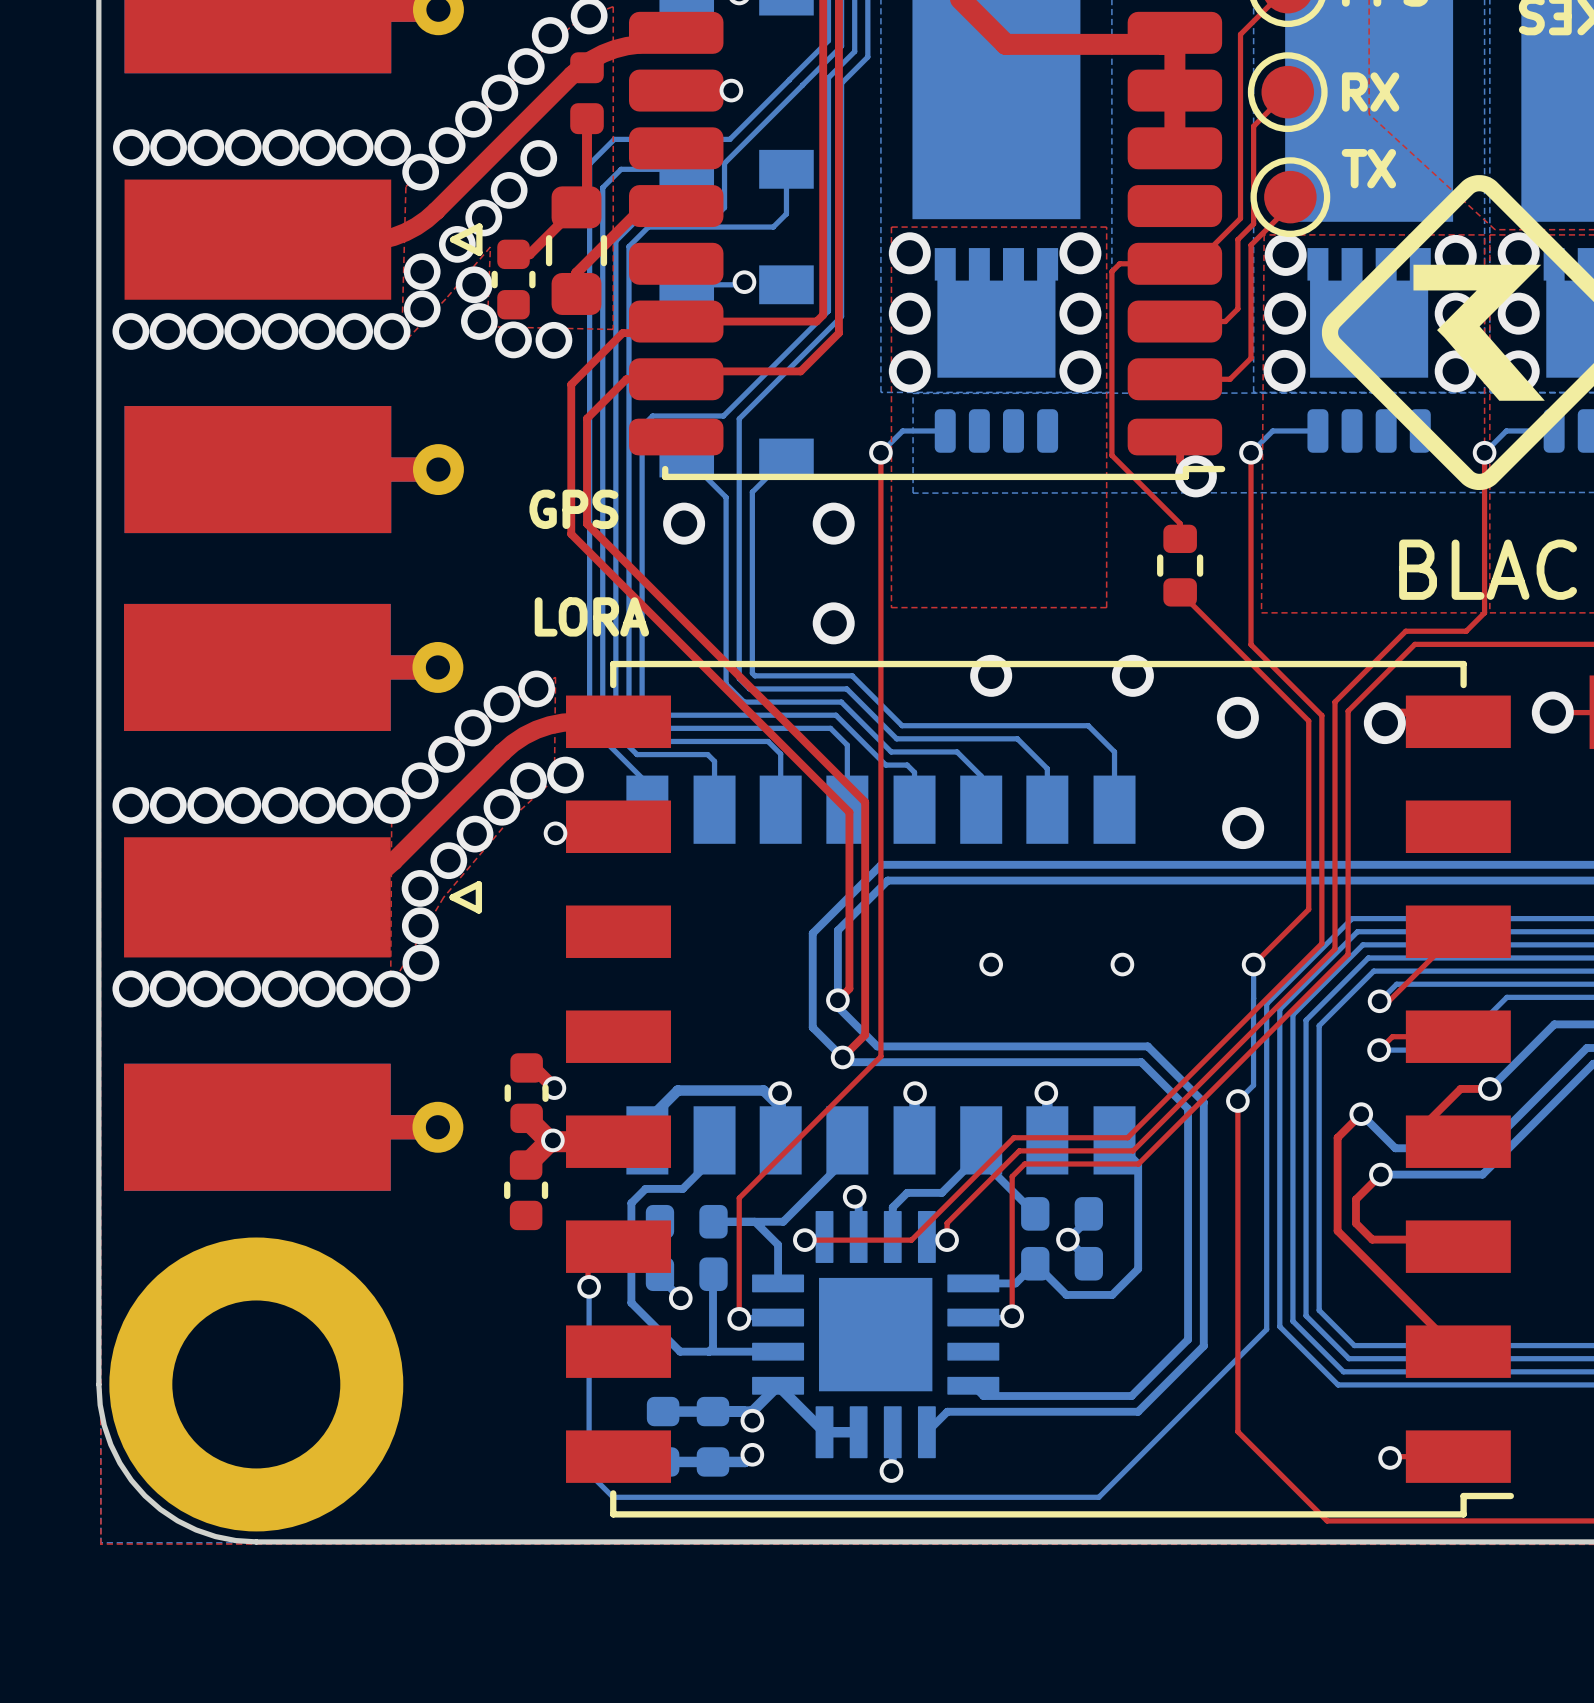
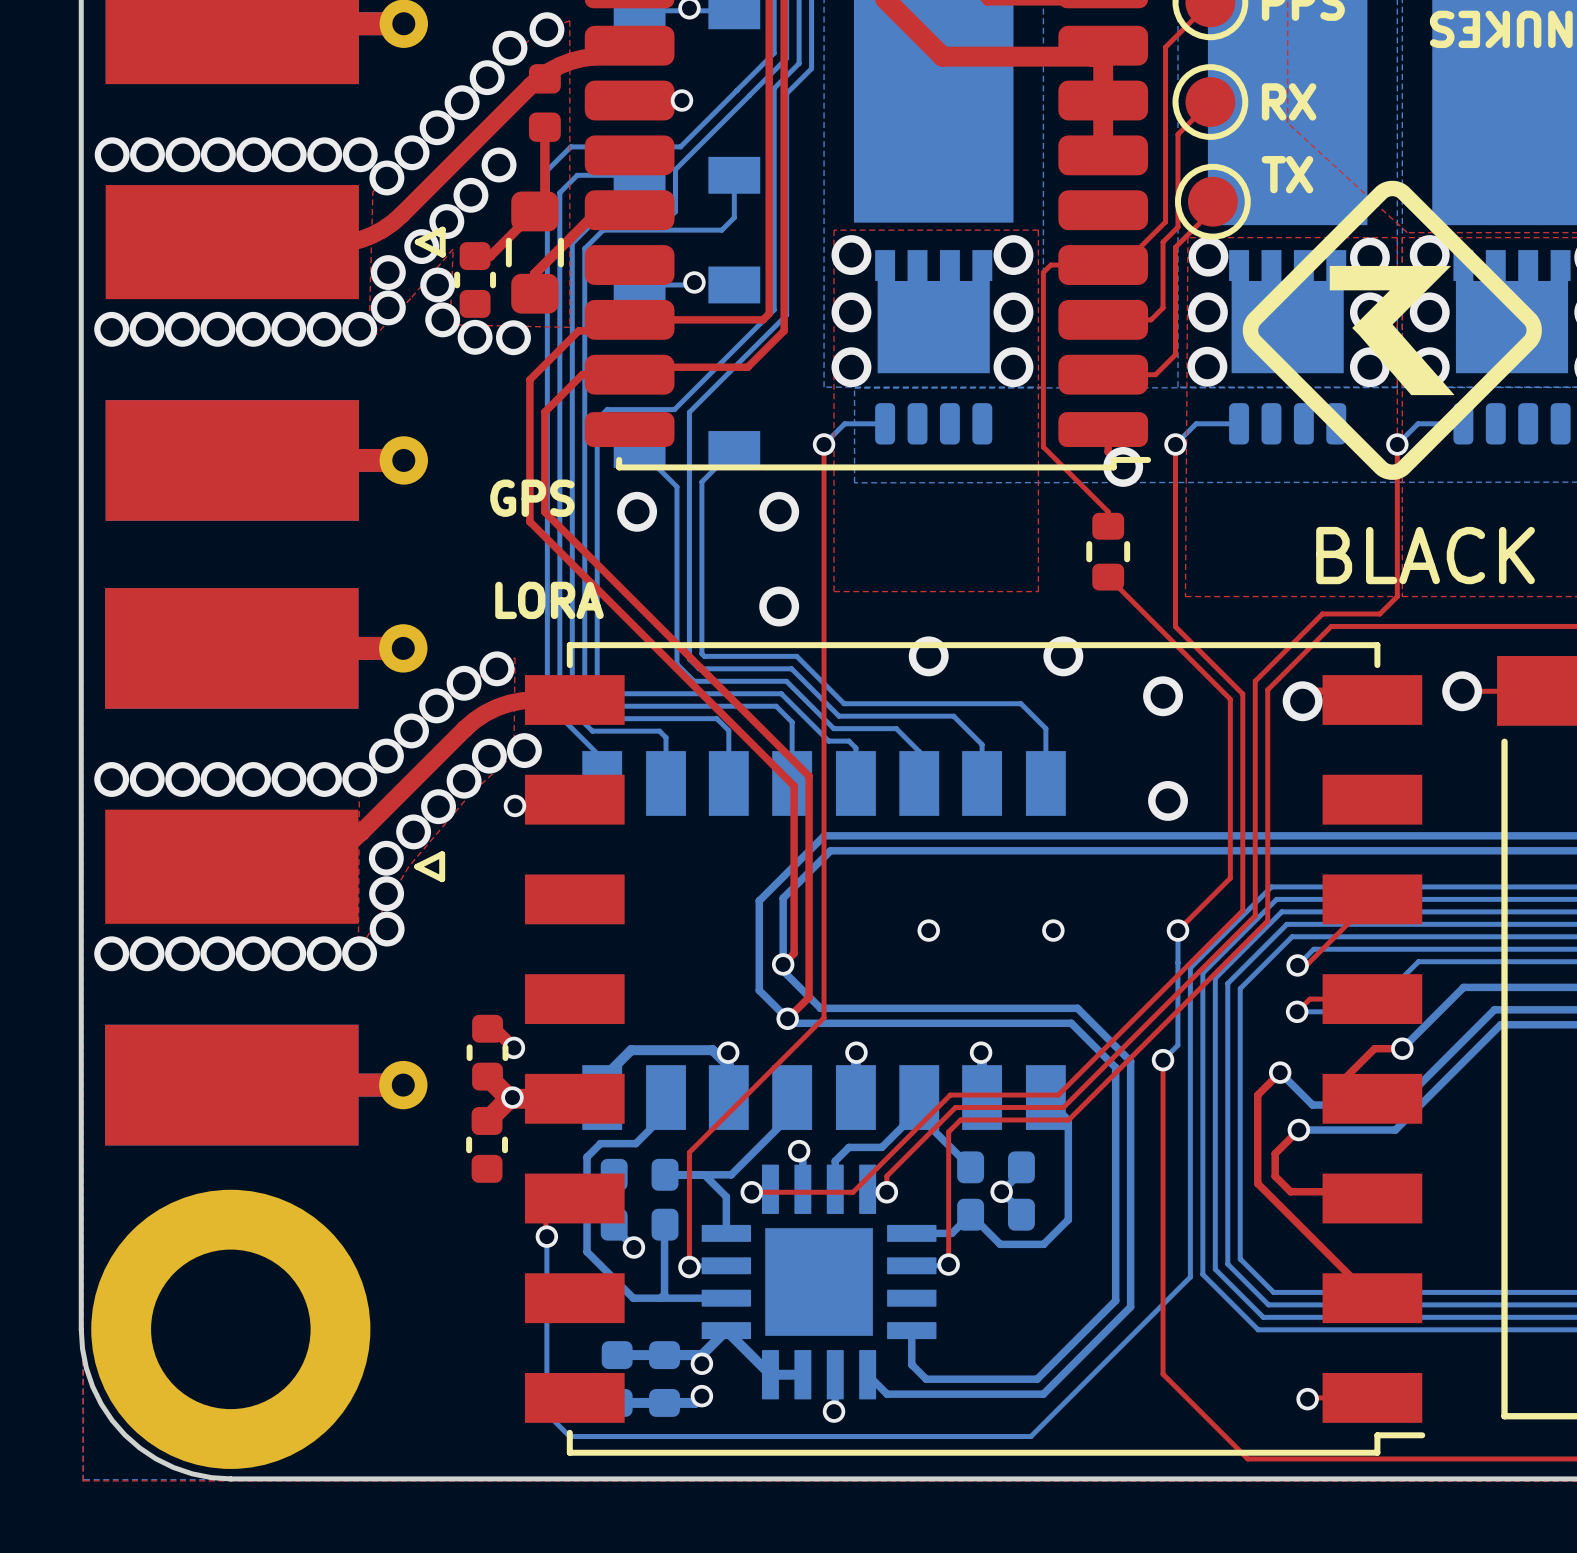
bottom track: (1188, 1339) (1131, 1396) (983, 1396) (973, 1385) -> (1115, 1286) (1115, 1300) (1037, 1379) (926, 1379) (911, 1364) (911, 1330)
bottom track: (1203, 1346) (1138, 1411) (947, 1411) (926, 1432) -> (1130, 1292) (1130, 1306) (1043, 1394) (887, 1394) (867, 1374)

